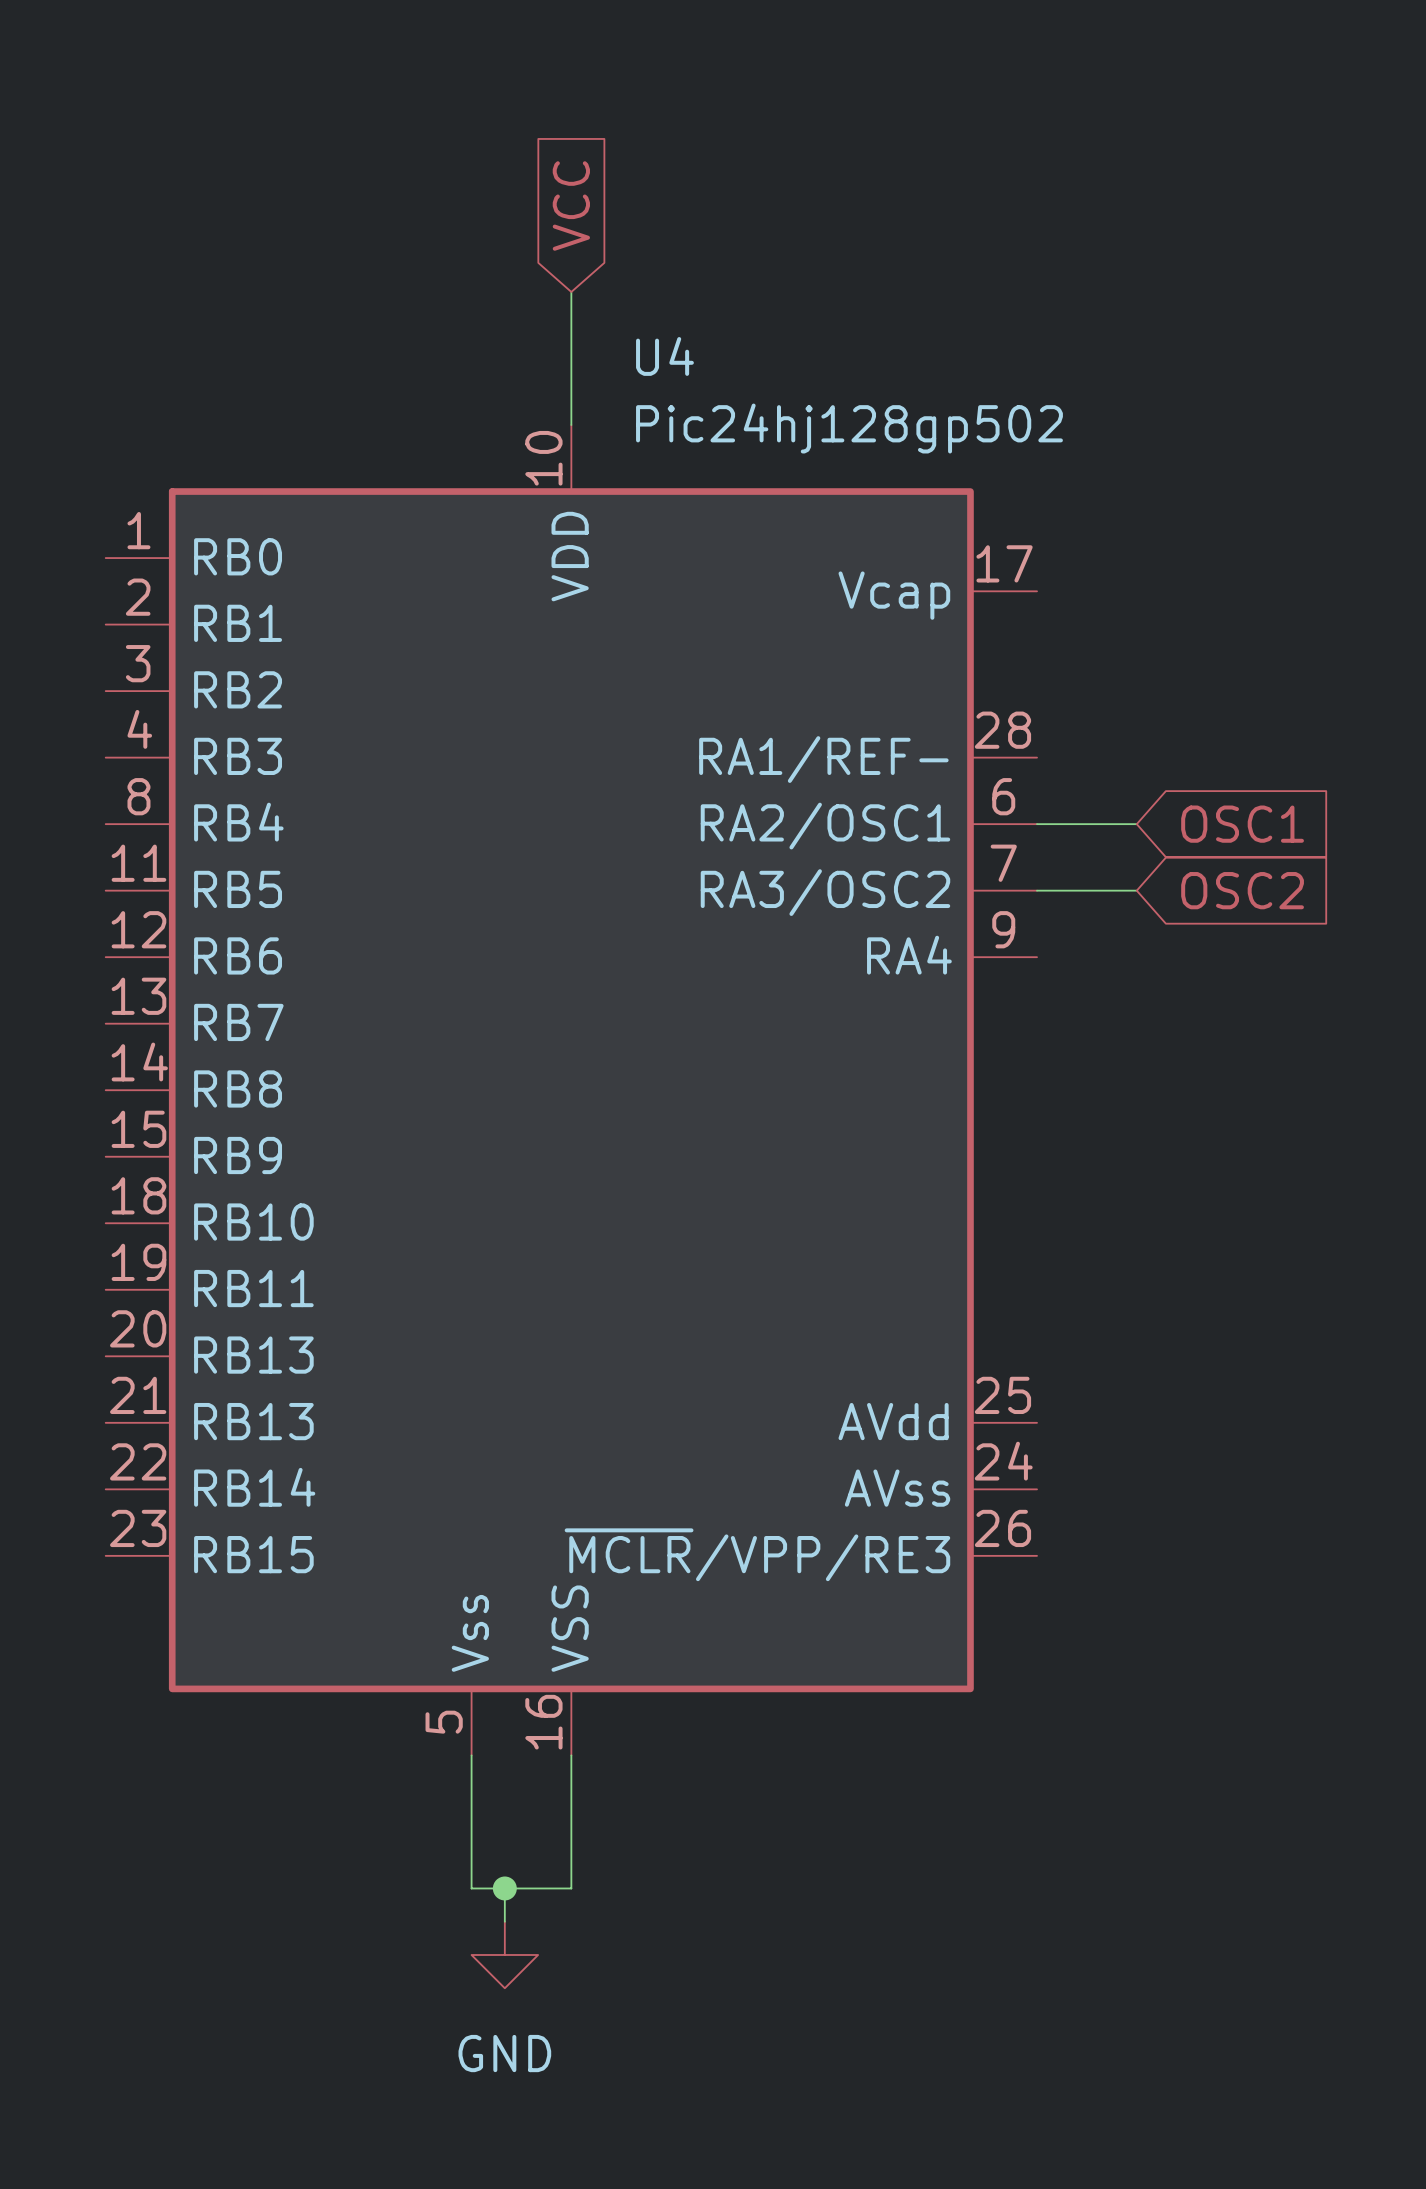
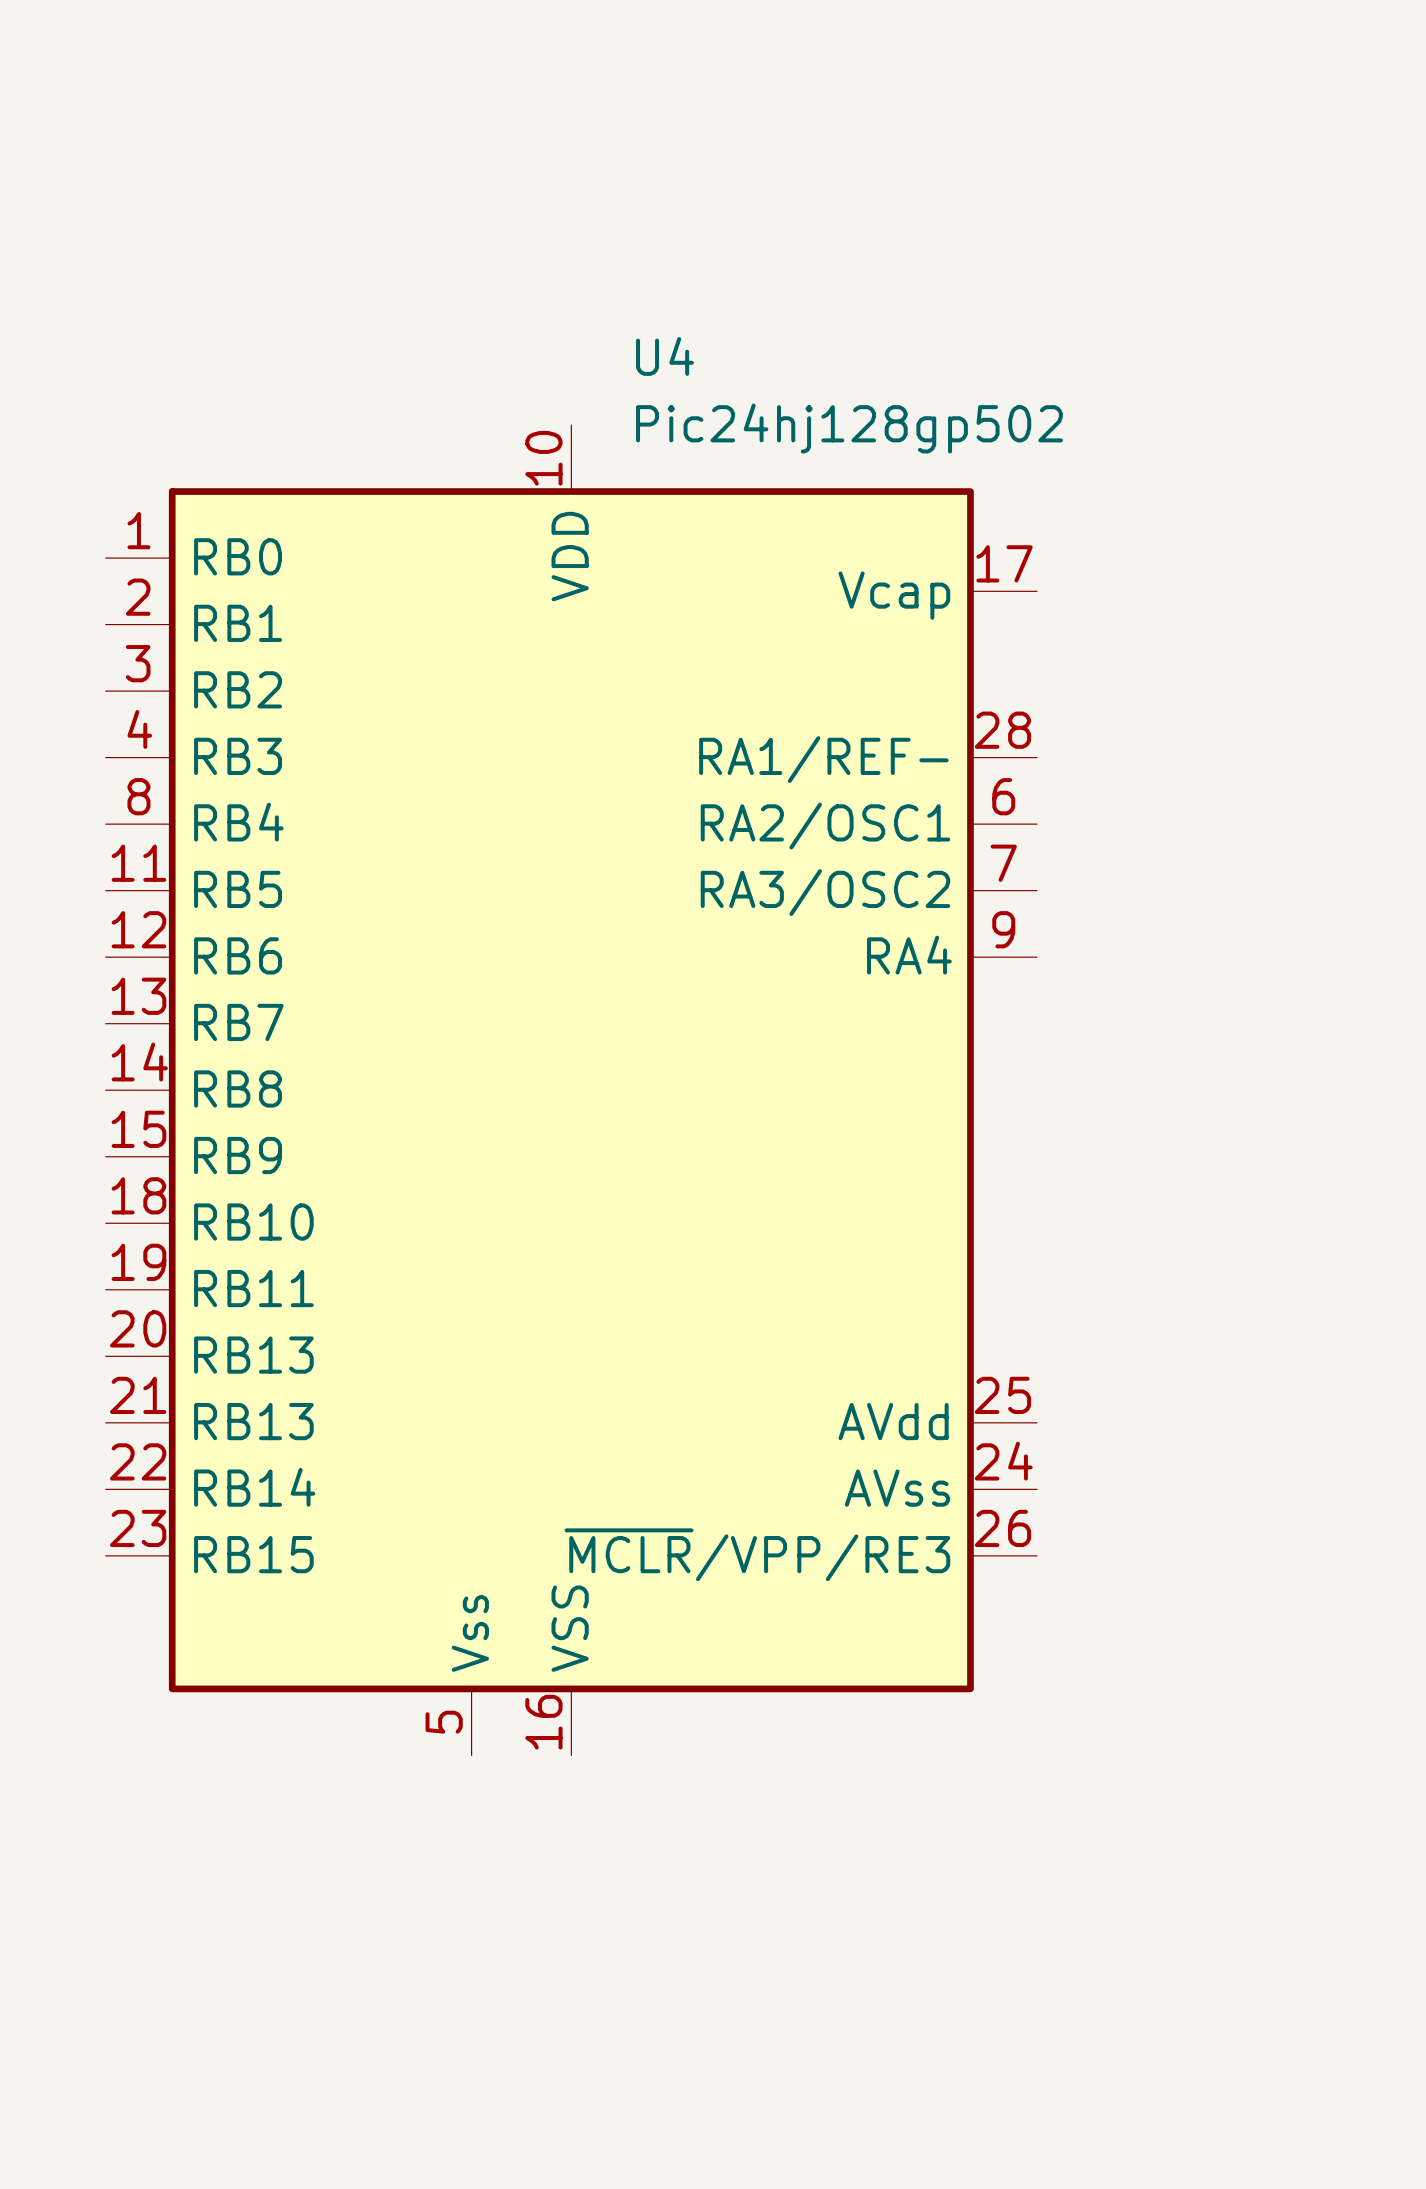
global label: VCC (571, 205) -> none
wire: (571, 291) (571, 425) -> none
wire: (1037, 824) (1136, 824) -> none
global label: OSC1 (1242, 824) -> none
wire: (1037, 890) (1136, 890) -> none
global label: OSC2 (1242, 890) -> none
wire: (471, 1755) (471, 1888) (571, 1888) (571, 1755) -> none
wire: (504, 1888) (504, 1921) -> none
junction: (504, 1888) -> none
power symbol: GND (504, 1954) -> none

